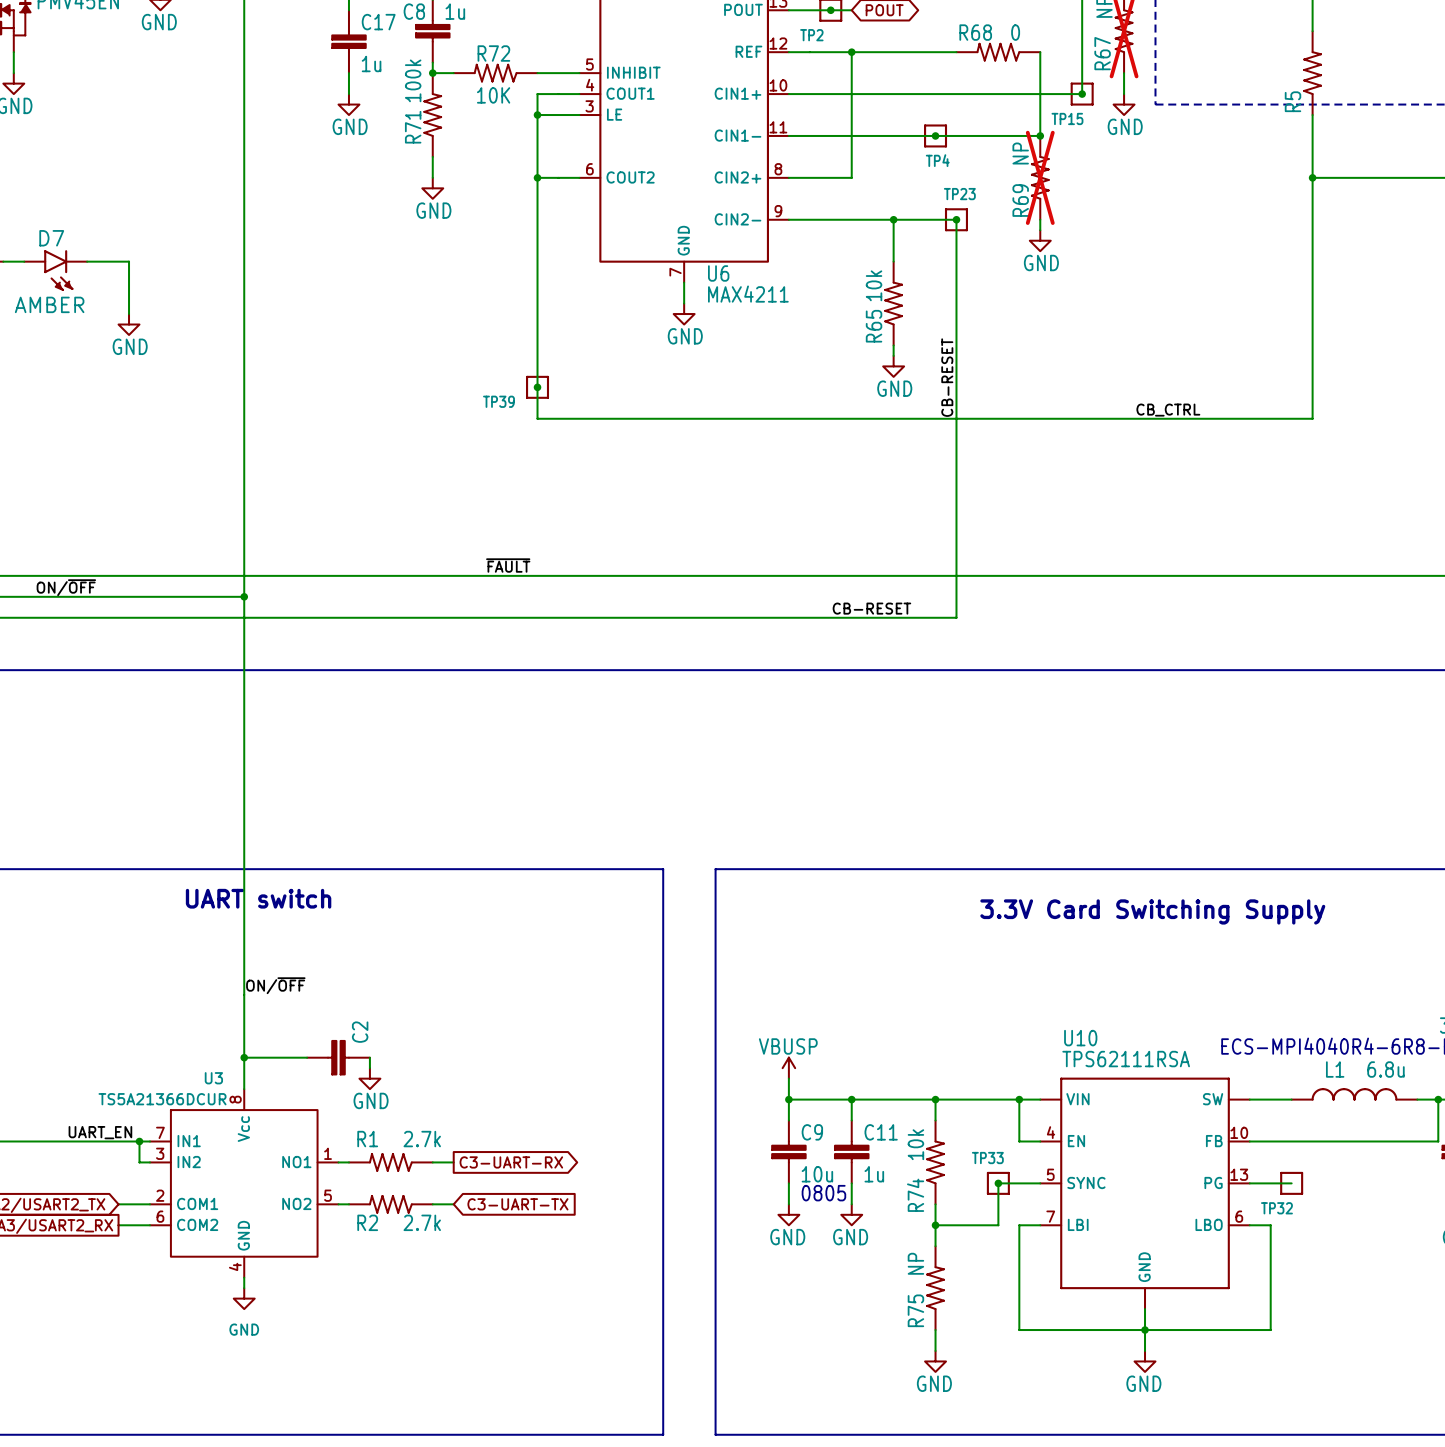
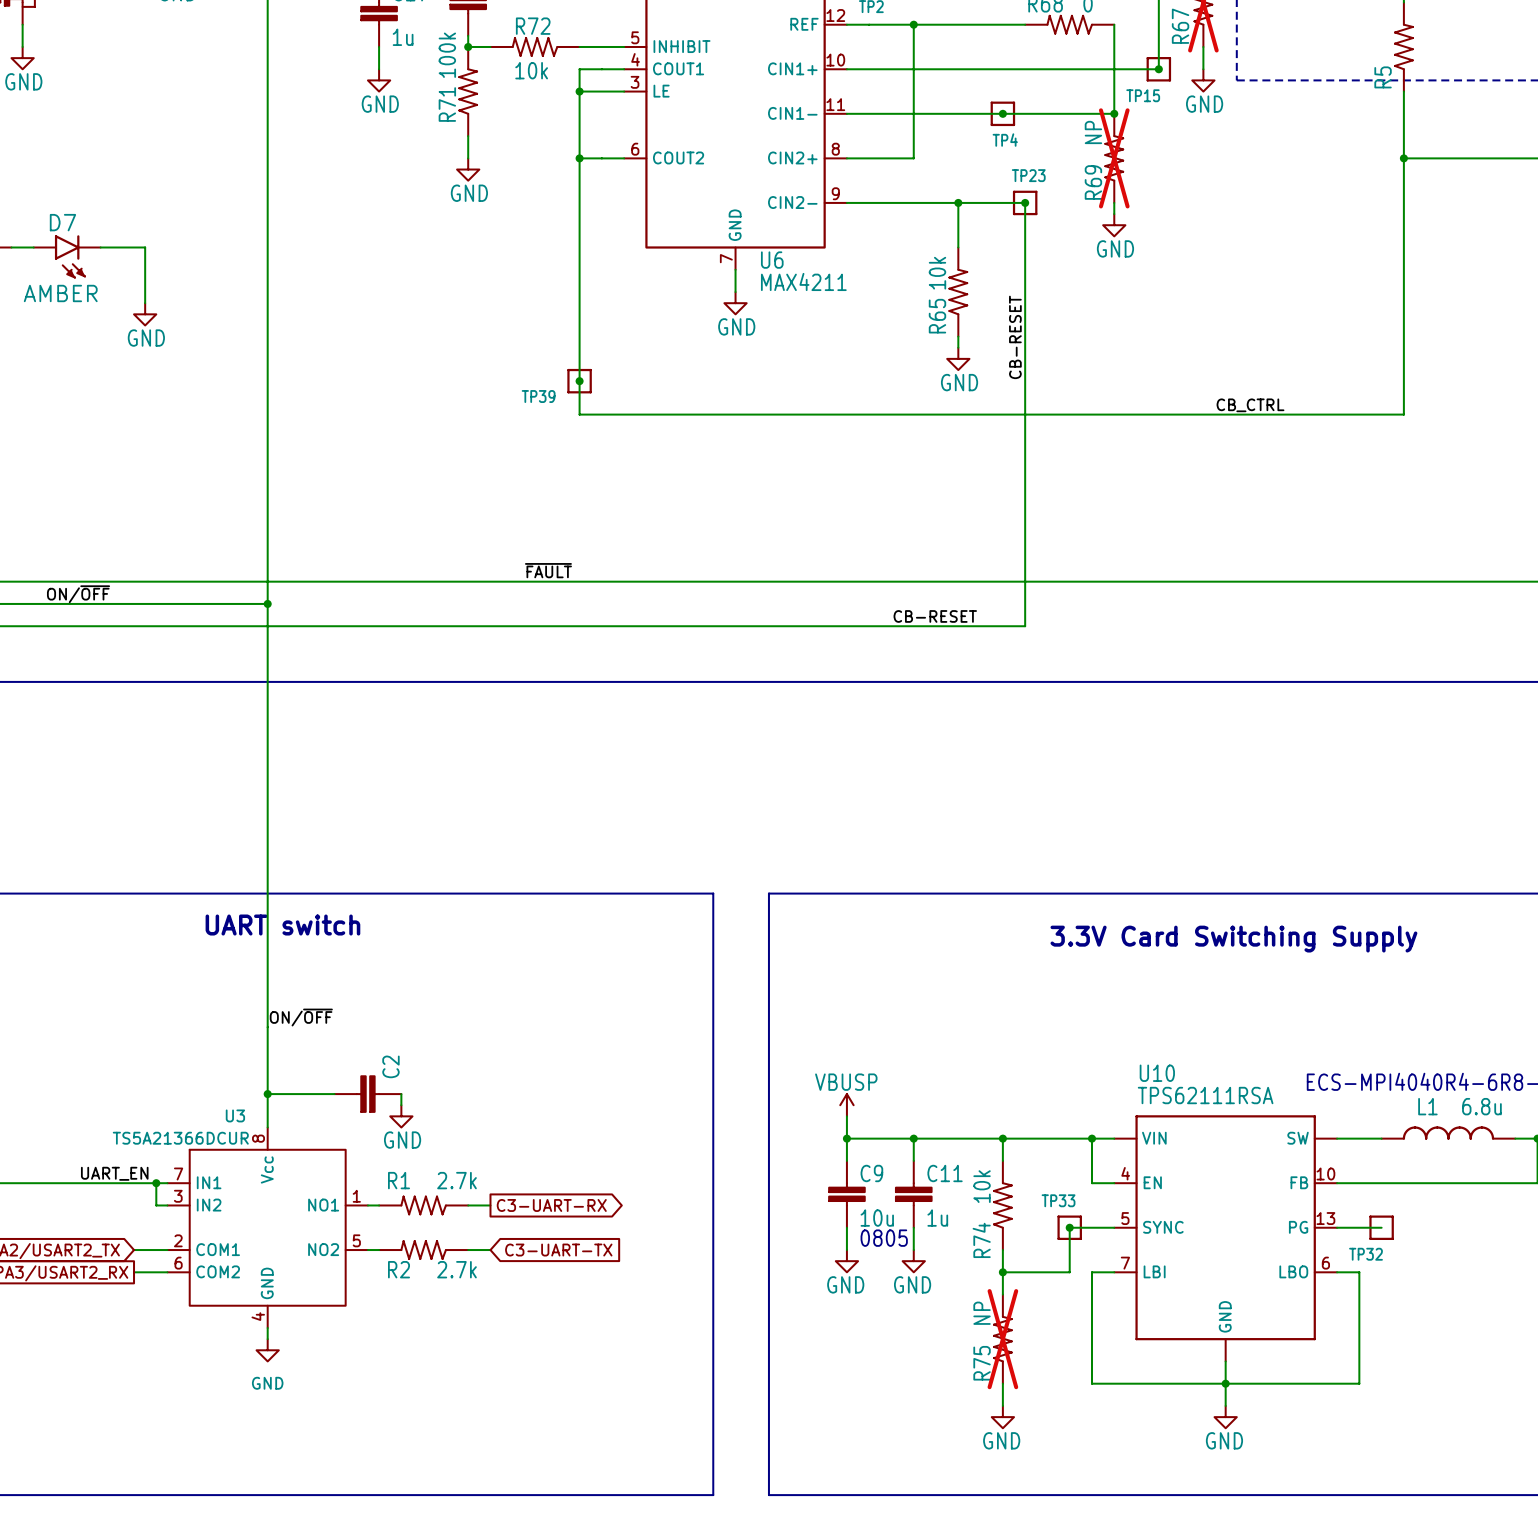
R72 value: 10K (493, 95) -> 10k (531, 70)
label position: CB-RESET (947, 377) -> CB-RESET (1015, 337)
R75 do-not-place cross: none -> (1002, 1339)

